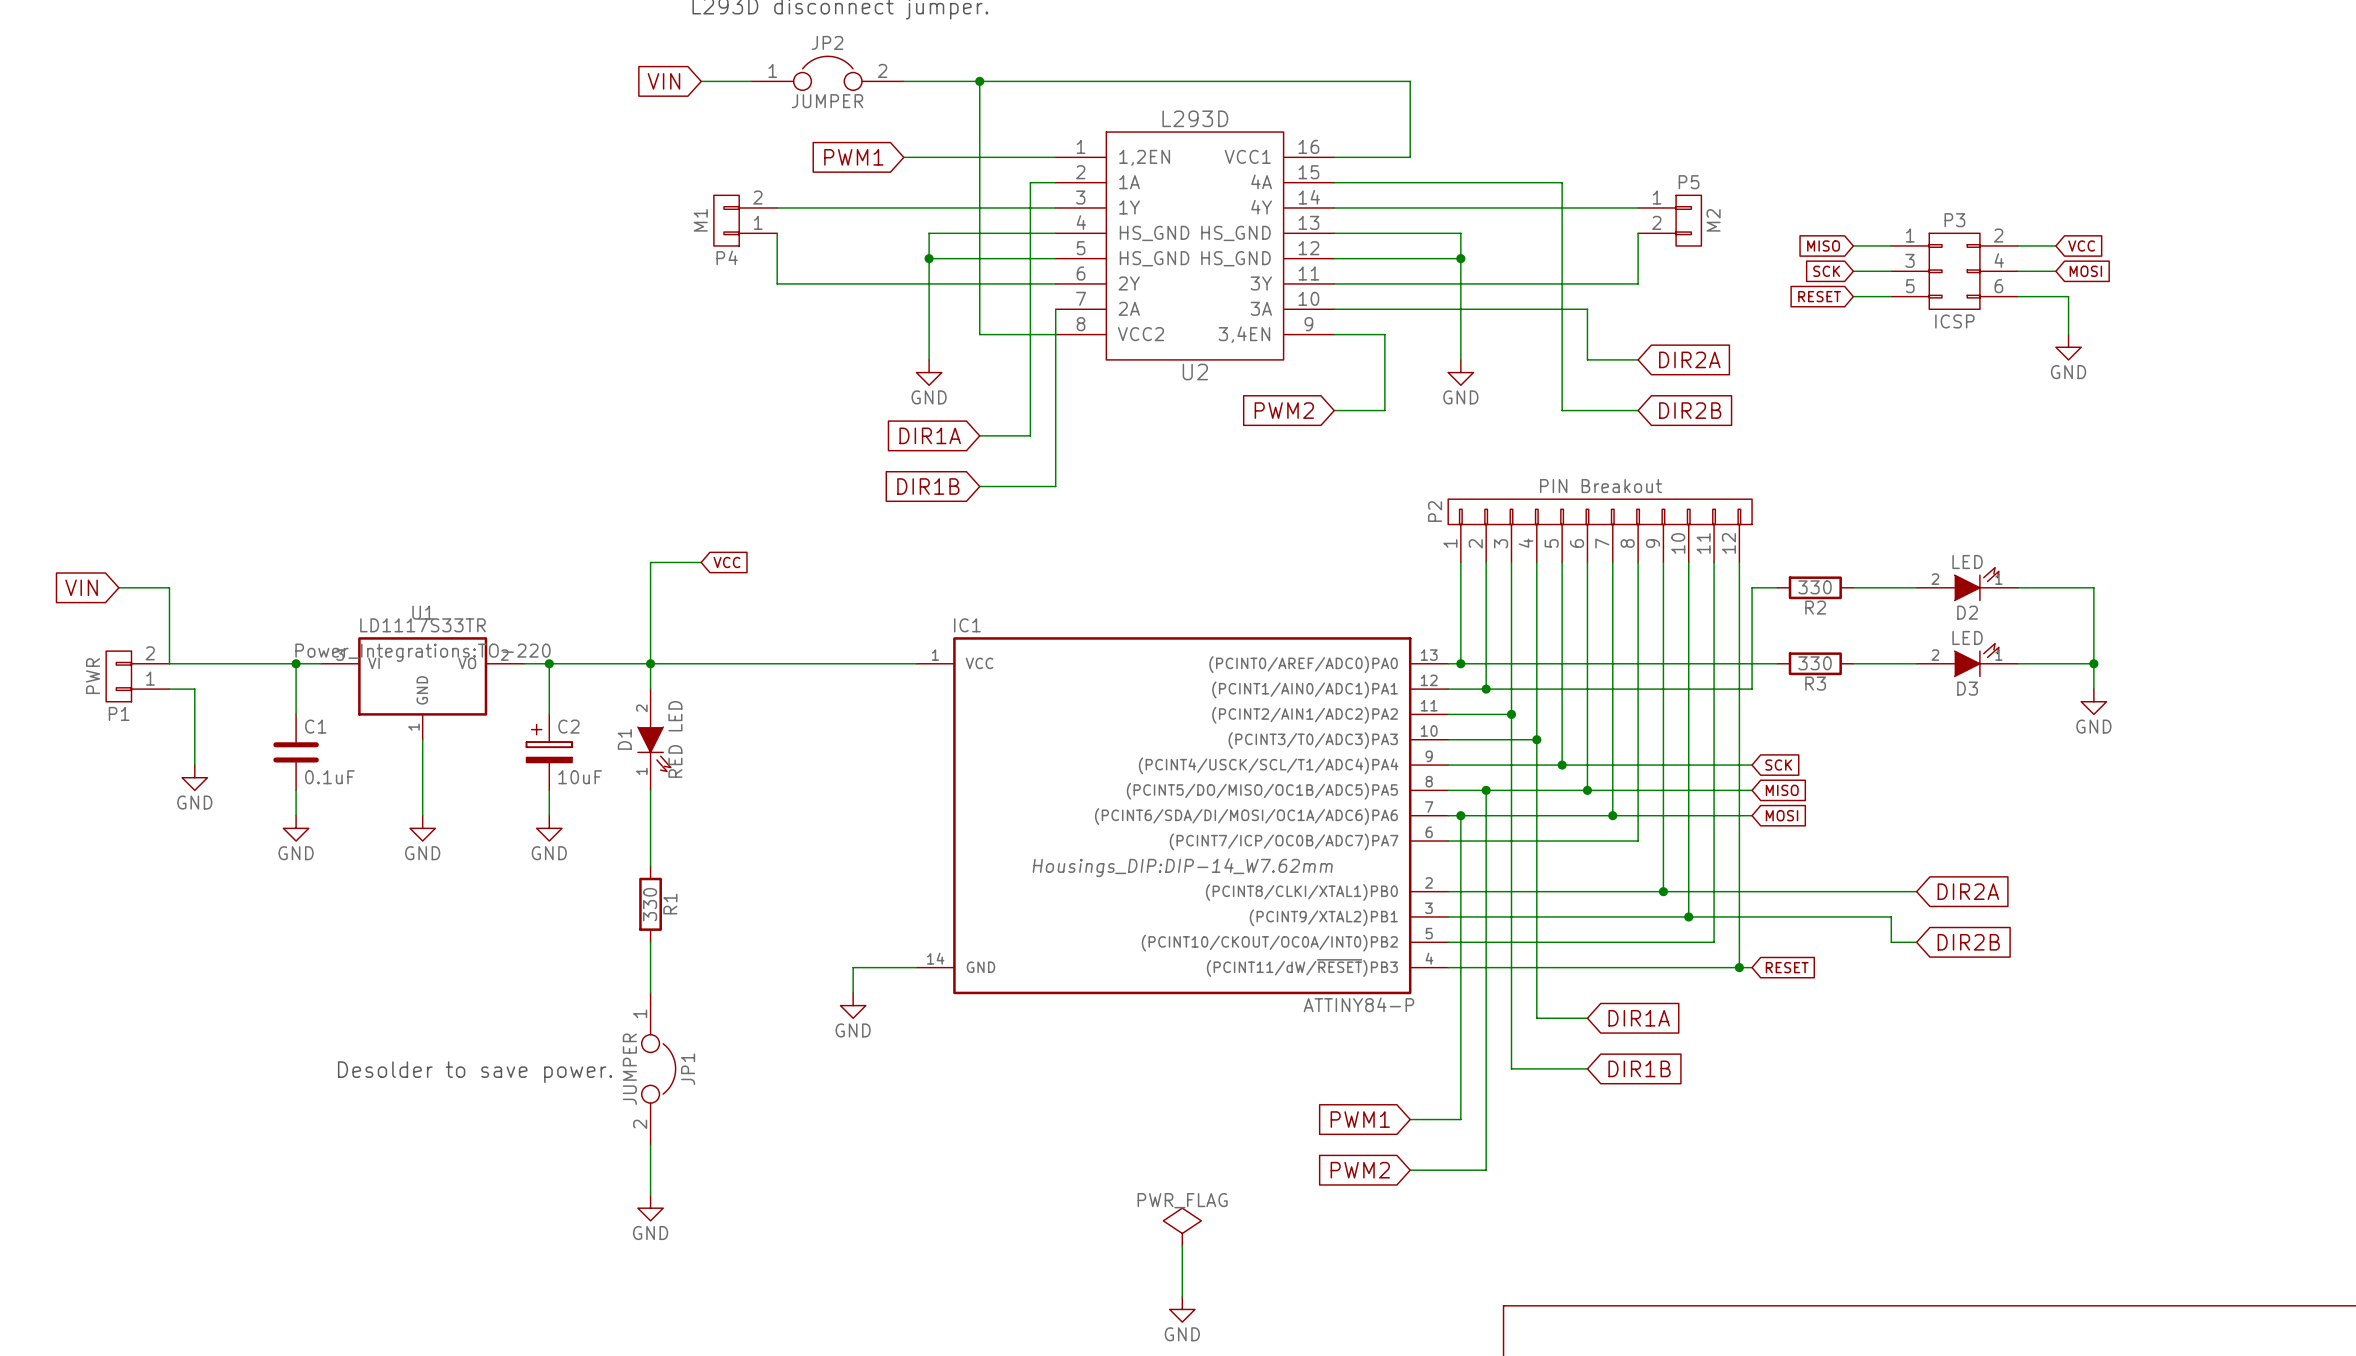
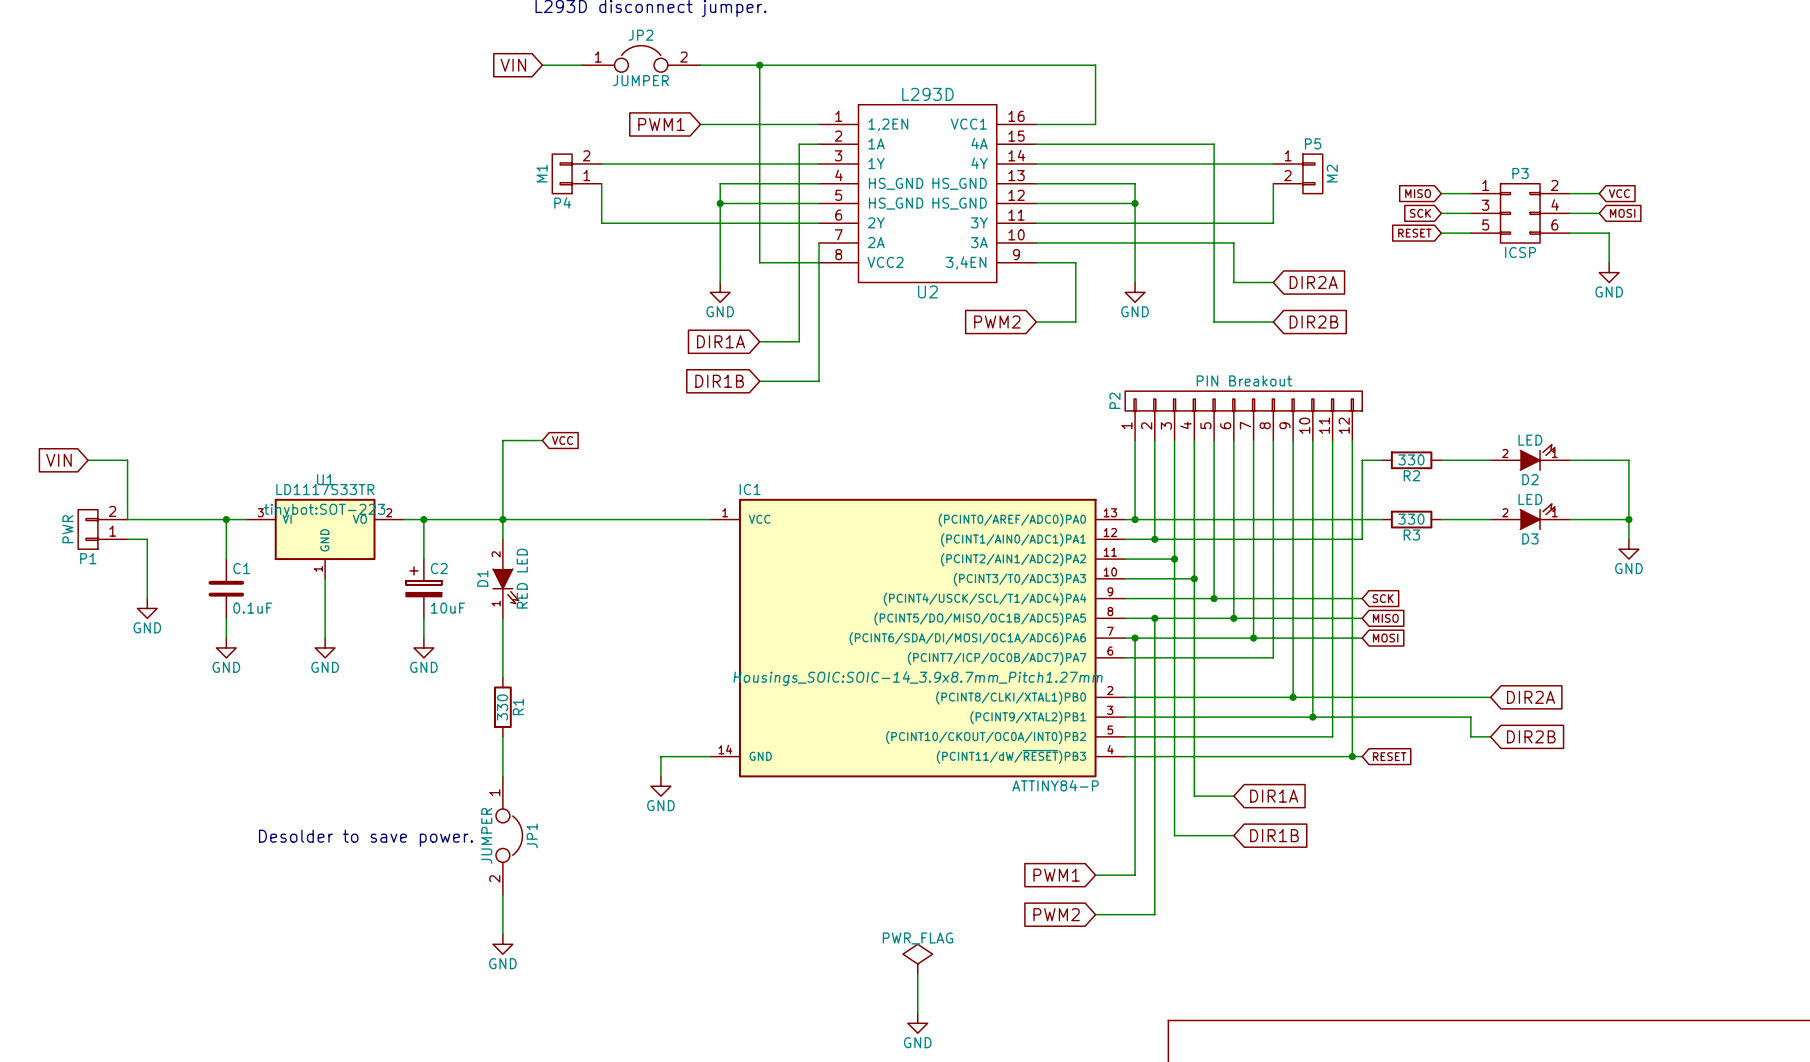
U1 text: Power_Integrations:TO-220 (422, 652) -> tinybot:SOT-223 (324, 510)
IC1 text: Housings_DIP:DIP-14_W7.62mm (1182, 867) -> Housings_SOIC:SOIC-14_3.9x8.7mm_Pitch1.27mm (918, 678)

